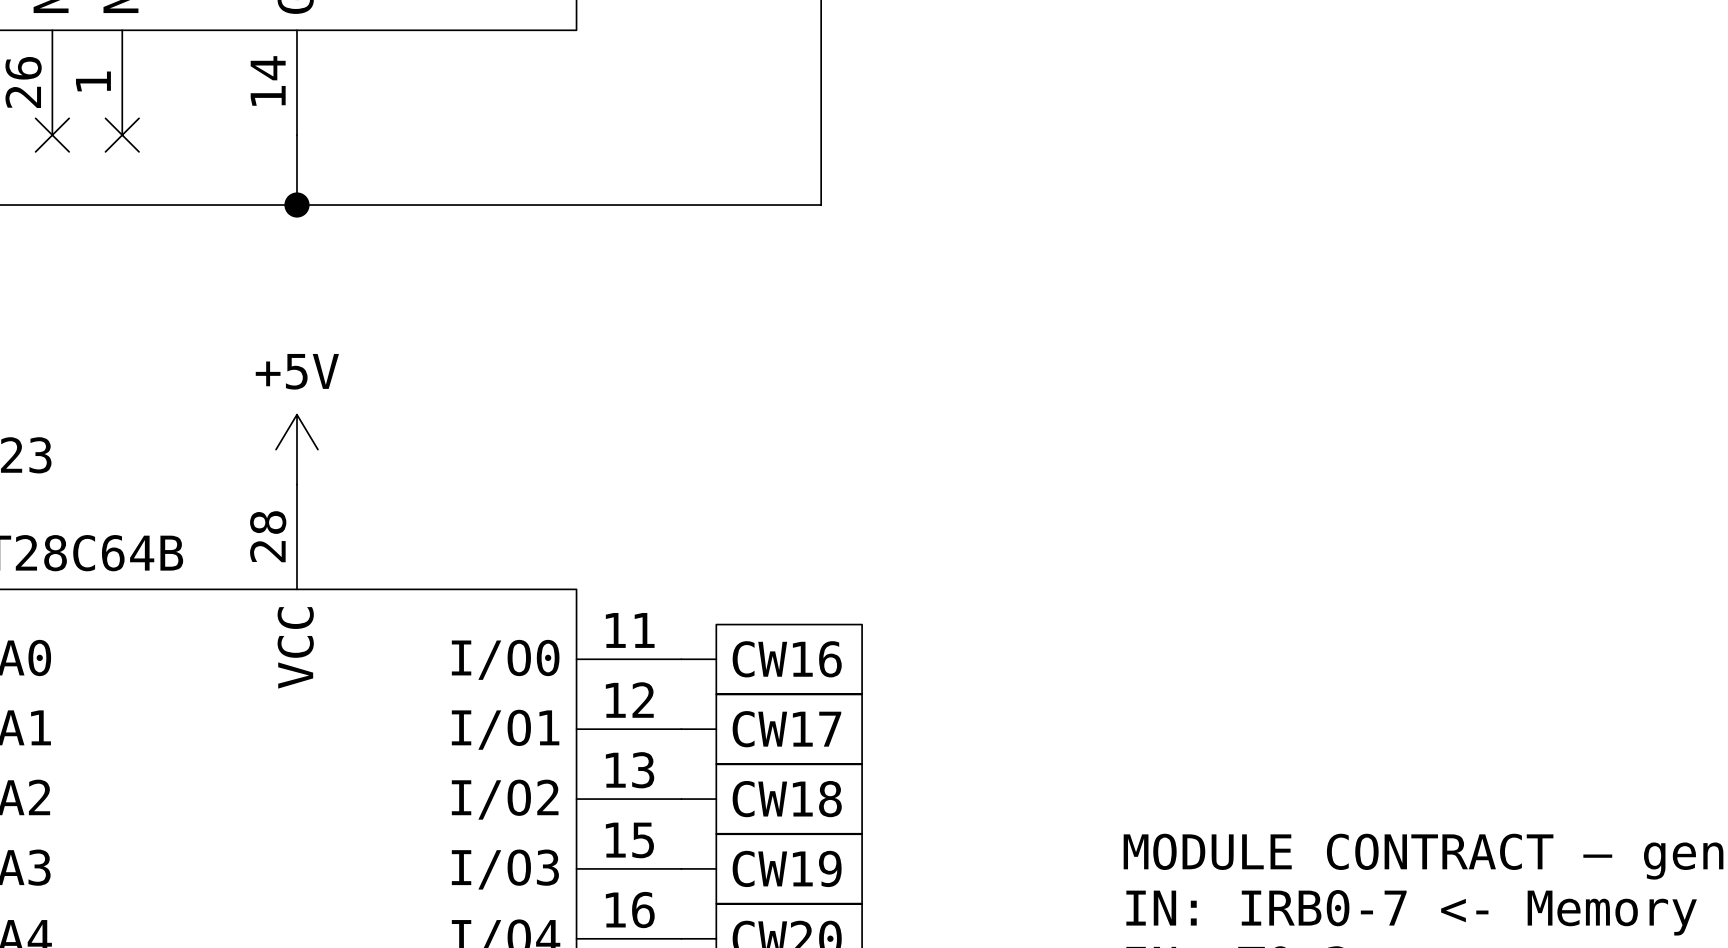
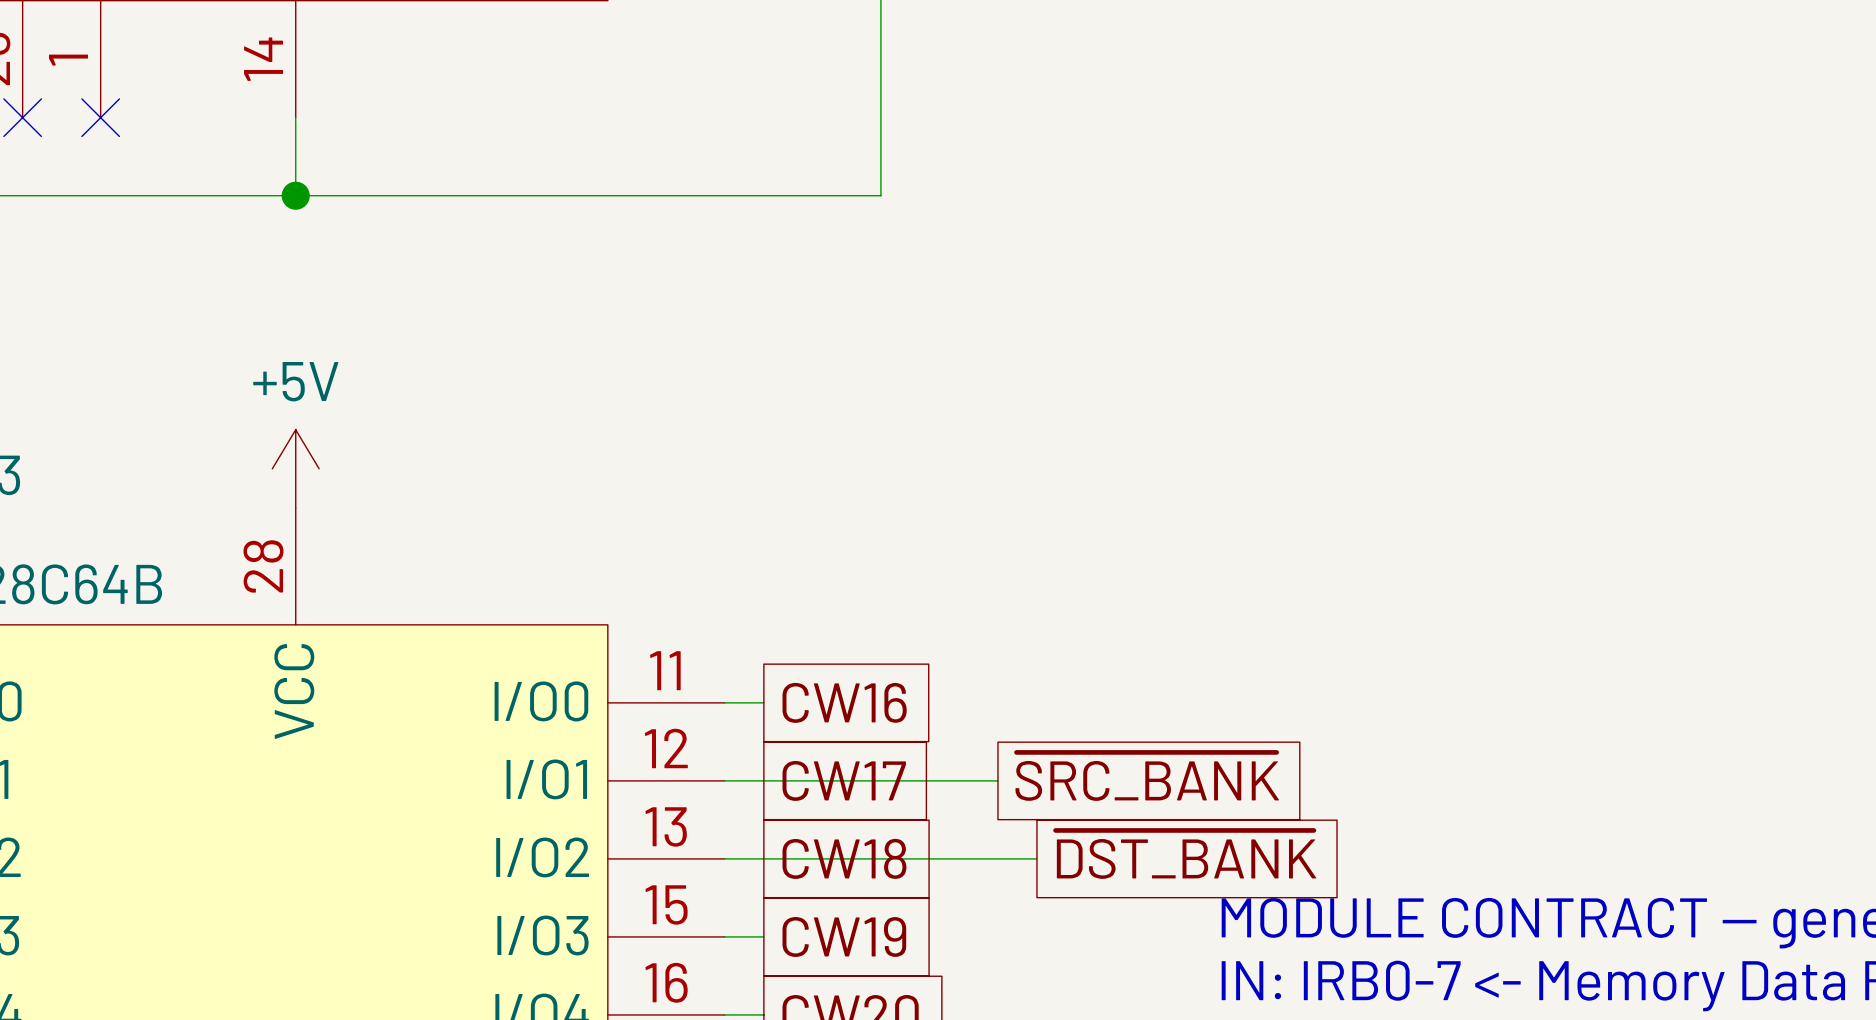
wire: none -> (763, 780) (997, 780)
global label: none -> ~{SRC_BANK} (1147, 776)
wire: none -> (763, 858) (1036, 858)
global label: none -> ~{DST_BANK} (1185, 854)

